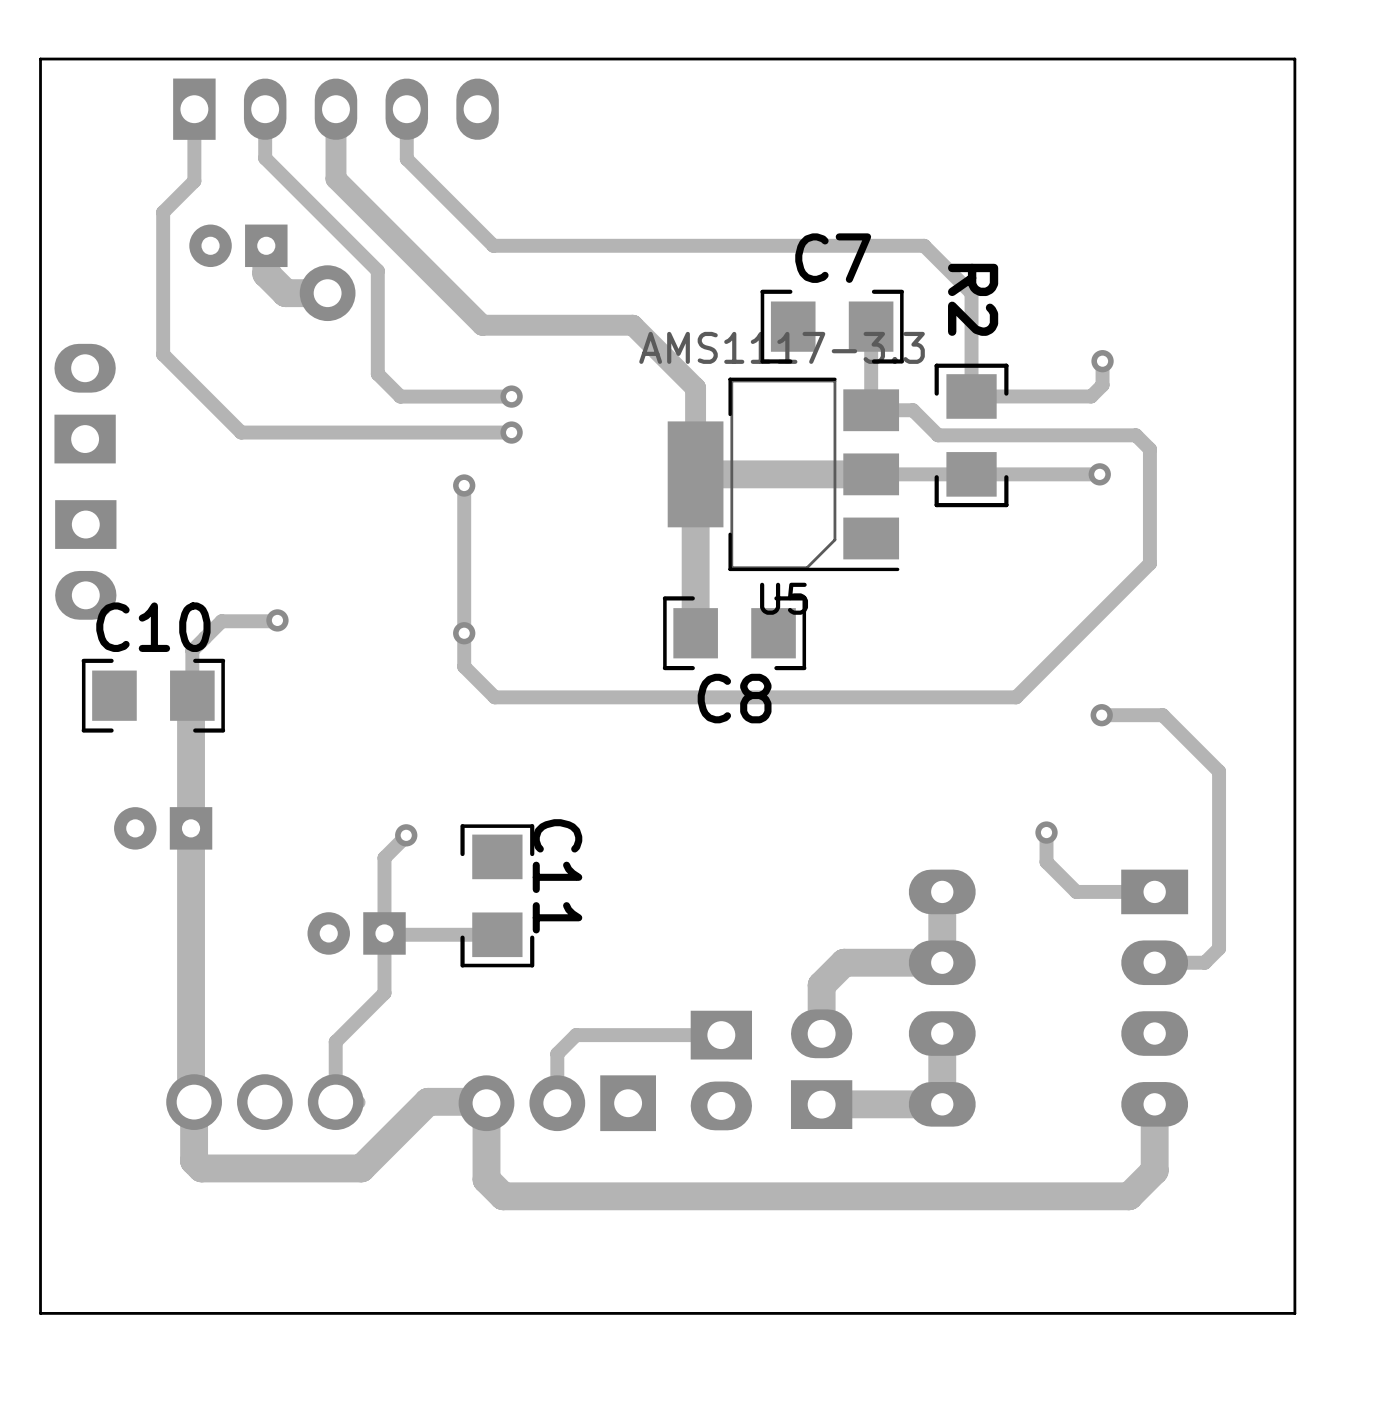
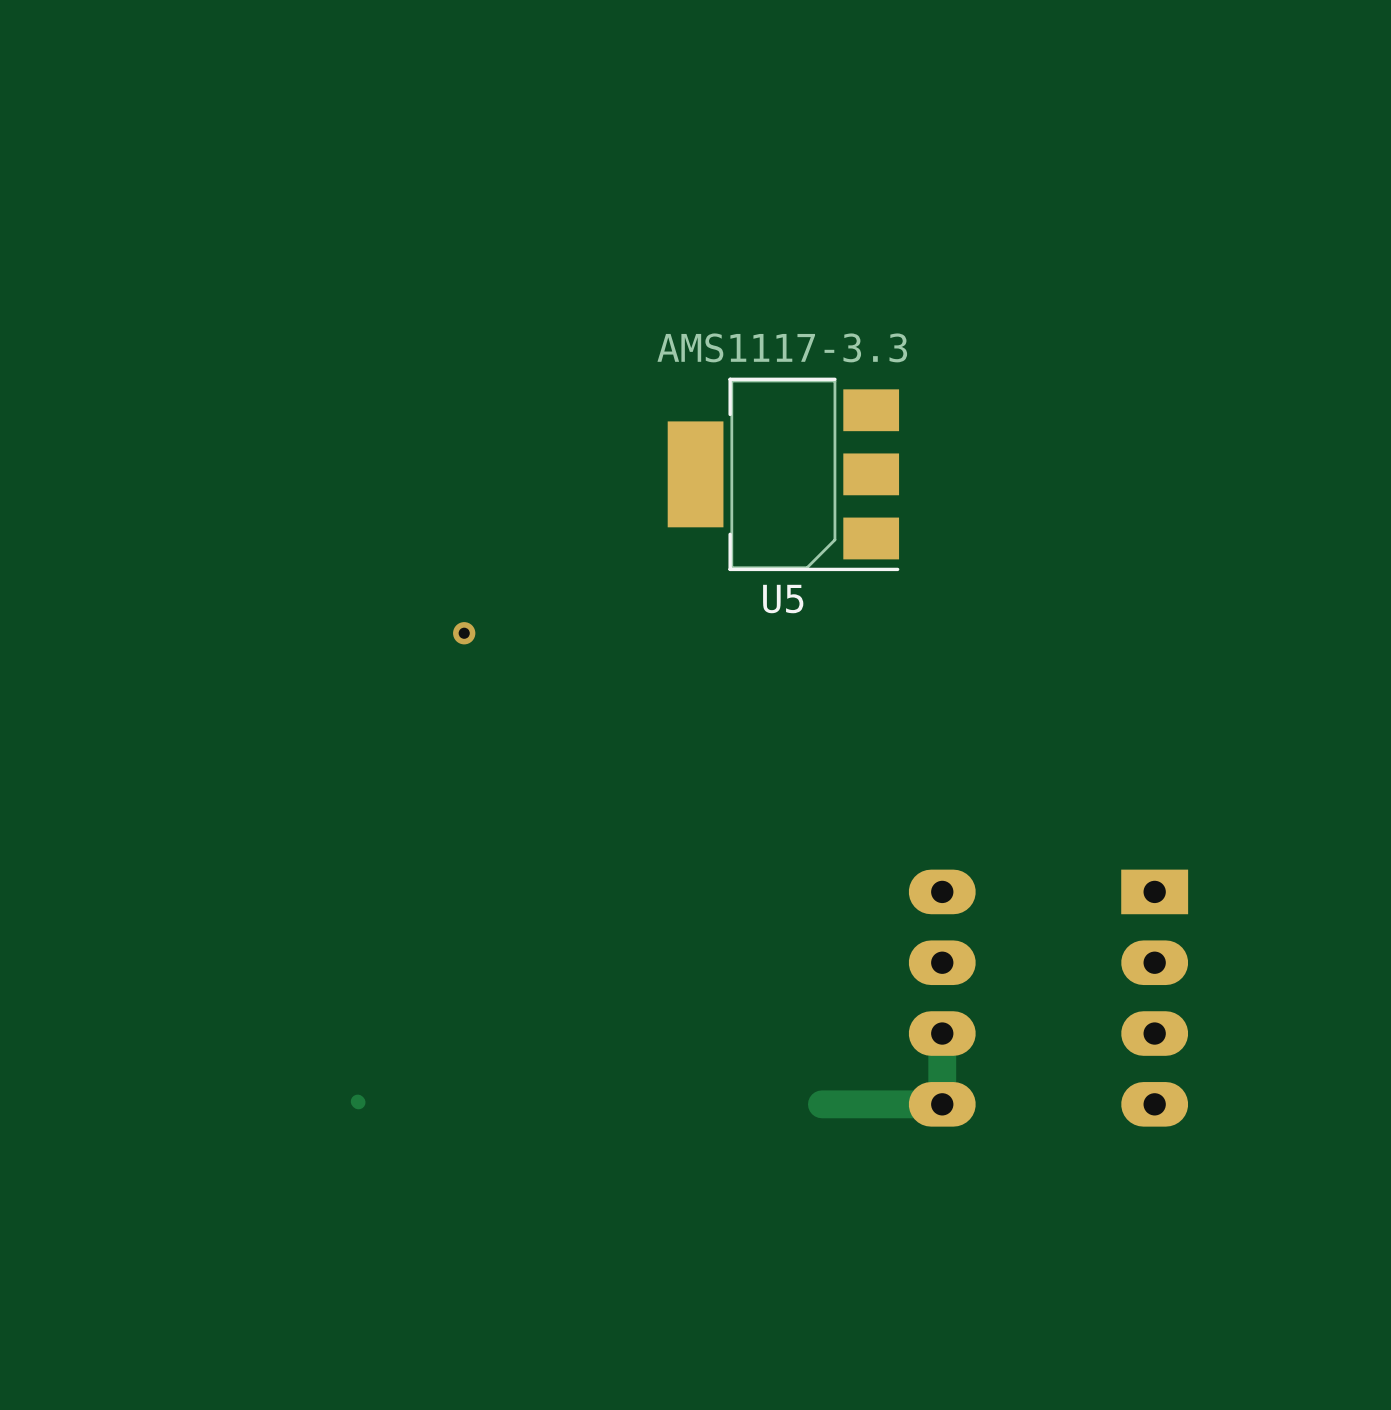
board edge: (1294, 59) (40, 59) (40, 1313) (1294, 1313) (1294, 59) -> none
track: (194, 109) (194, 181) (163, 212) (163, 354) (241, 432) (511, 432) -> none
track: (265, 109) (265, 158) (377, 270) (377, 374) (400, 396) (511, 396) -> none
track: (335, 109) (335, 178) (482, 325) (632, 325) (695, 387) (695, 474) -> none
part: (335, 109) -> none
track: (406, 109) (406, 159) (493, 245) (924, 245) (971, 293) (971, 396) (1091, 396) (1102, 385) (1102, 361) -> none
part: (238, 245) -> none
track: (266, 245) (266, 273) (285, 293) (327, 293) -> none
via: (327, 293) -> none
C7: (832, 326) -> none
track: (871, 326) (871, 410) (912, 410) (938, 435) (1135, 435) (1149, 449) (1149, 563) (1016, 697) (494, 697) (464, 666) (464, 485) -> none
via: (1102, 361) -> none
via: (511, 396) -> none
part: (85, 403) -> none
via: (511, 432) -> none
R2: (971, 435) -> none
track: (695, 474) (695, 633) -> none
track: (1099, 474) (695, 474) -> none
via: (1099, 474) -> none
via: (464, 485) -> none
part: (85, 559) -> none
via: (277, 620) -> none
track: (276, 621) (221, 621) (192, 650) (191, 1099) (194, 1102) (194, 1160) (201, 1168) (361, 1168) (427, 1101) (485, 1101) (486, 1179) (503, 1196) (1129, 1196) (1154, 1170) (1154, 1104) -> none
C8: (734, 633) -> none
C10: (153, 695) -> none
track: (1101, 715) (1162, 715) (1219, 771) (1219, 948) (1204, 962) (1154, 962) -> none
via: (1101, 715) -> none
part: (163, 828) -> none
track: (1046, 832) (1046, 862) (1076, 891) (1154, 891) -> none
via: (1046, 832) -> none
via: (406, 835) -> none
track: (406, 836) (384, 857) (384, 993) (335, 1041) (335, 1102) -> none
track: (942, 891) (942, 962) (844, 962) (821, 985) (821, 1033) -> none
C11: (497, 895) -> none
part: (356, 933) -> none
track: (384, 933) (497, 934) -> none
track: (721, 1035) (576, 1035) (557, 1053) (557, 1103) -> none
part: (821, 1069) -> none
part: (721, 1070) -> none
part: (264, 1102) -> none
part: (557, 1103) -> none

